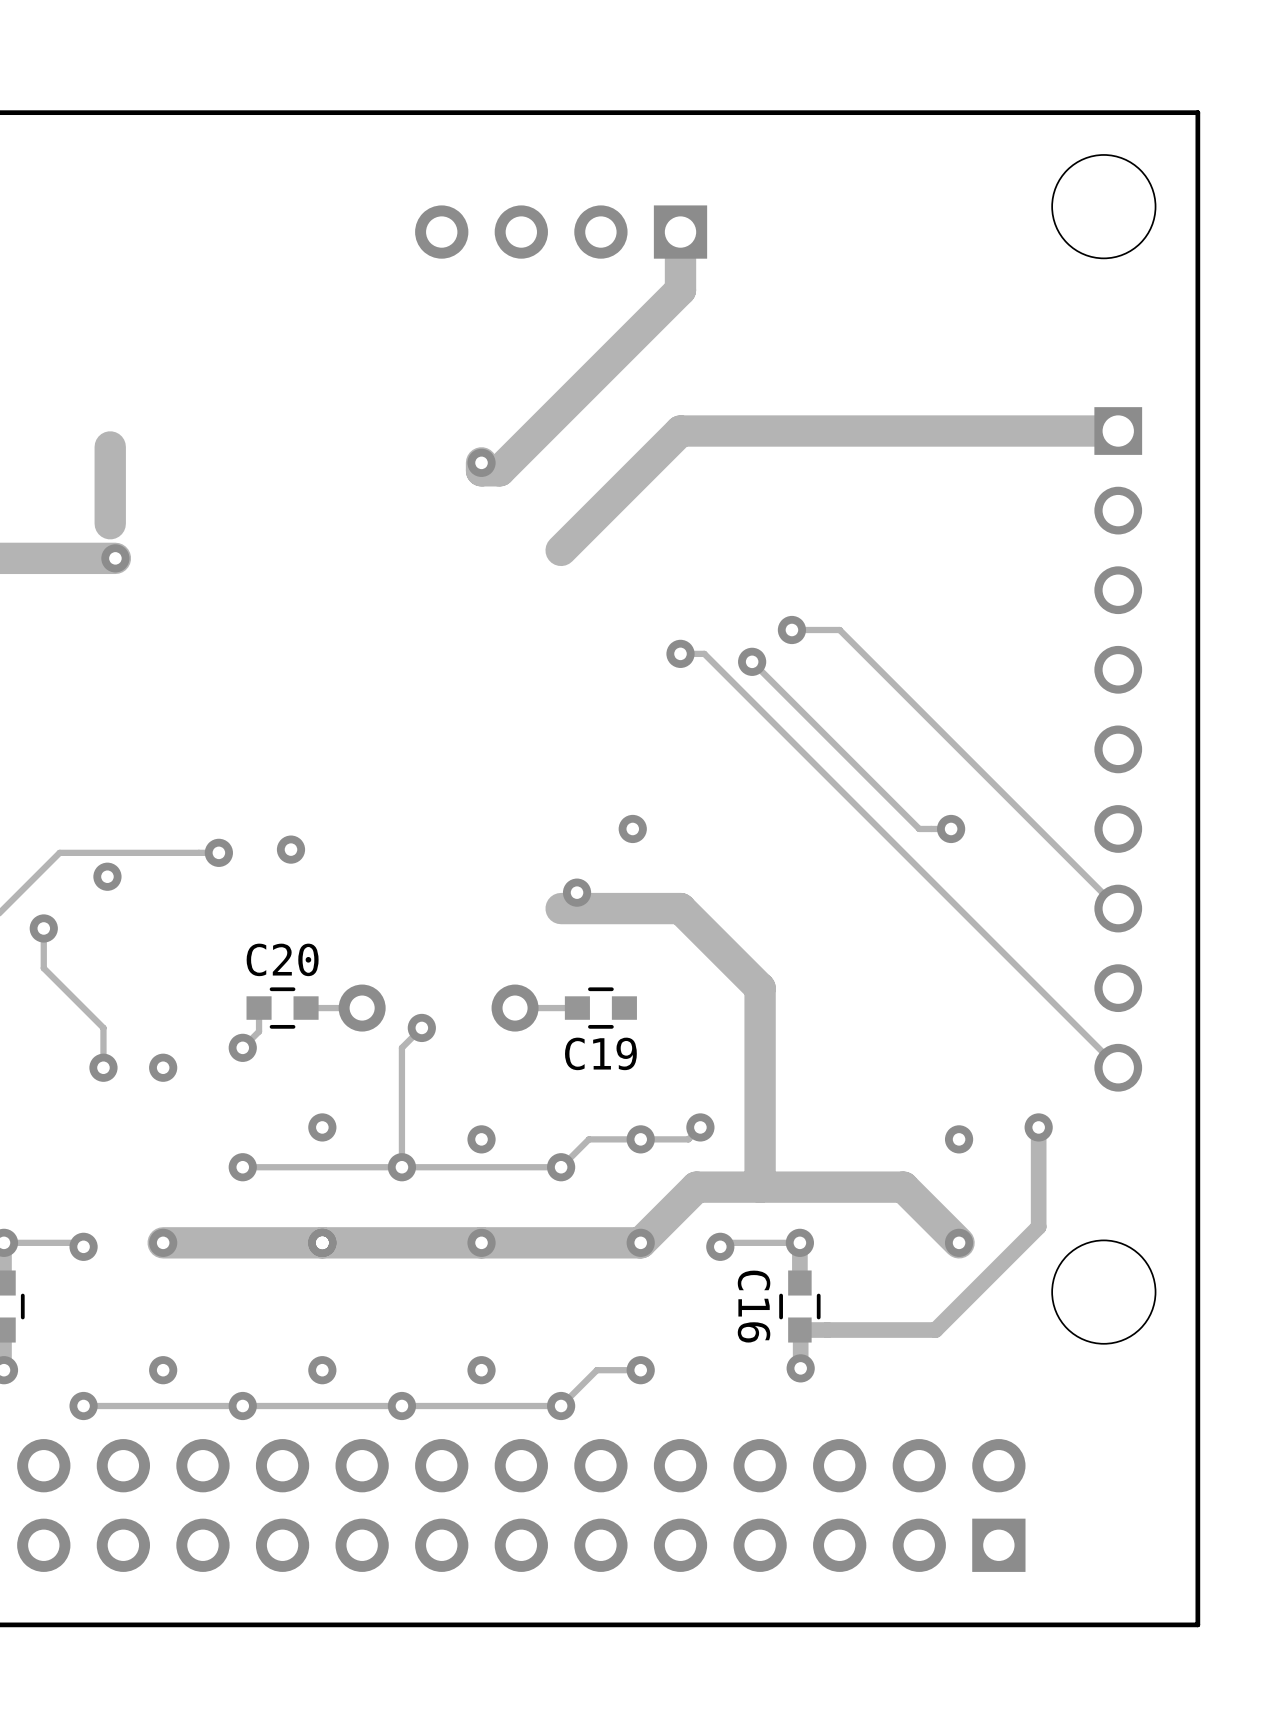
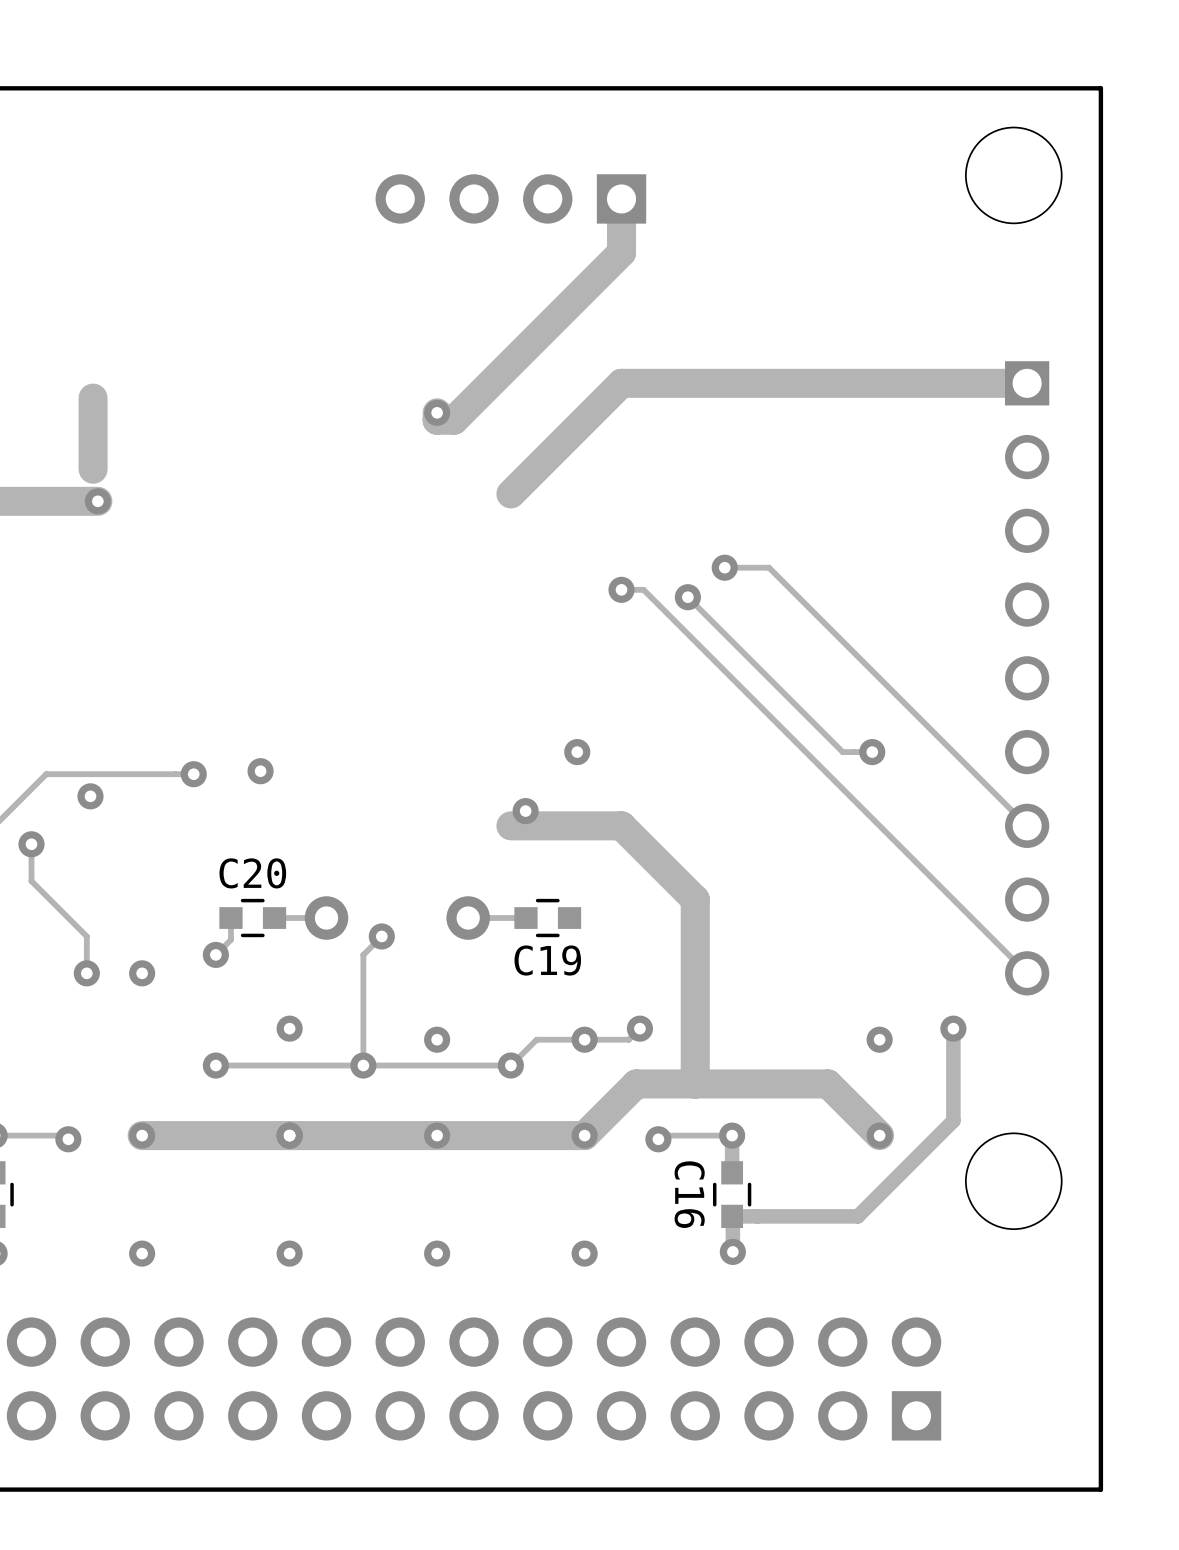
track: (640, 1370) (596, 1370) (561, 1406) (83, 1406) -> none
via: (83, 1406) -> none
via: (242, 1406) -> none
via: (401, 1406) -> none
via: (561, 1406) -> none

